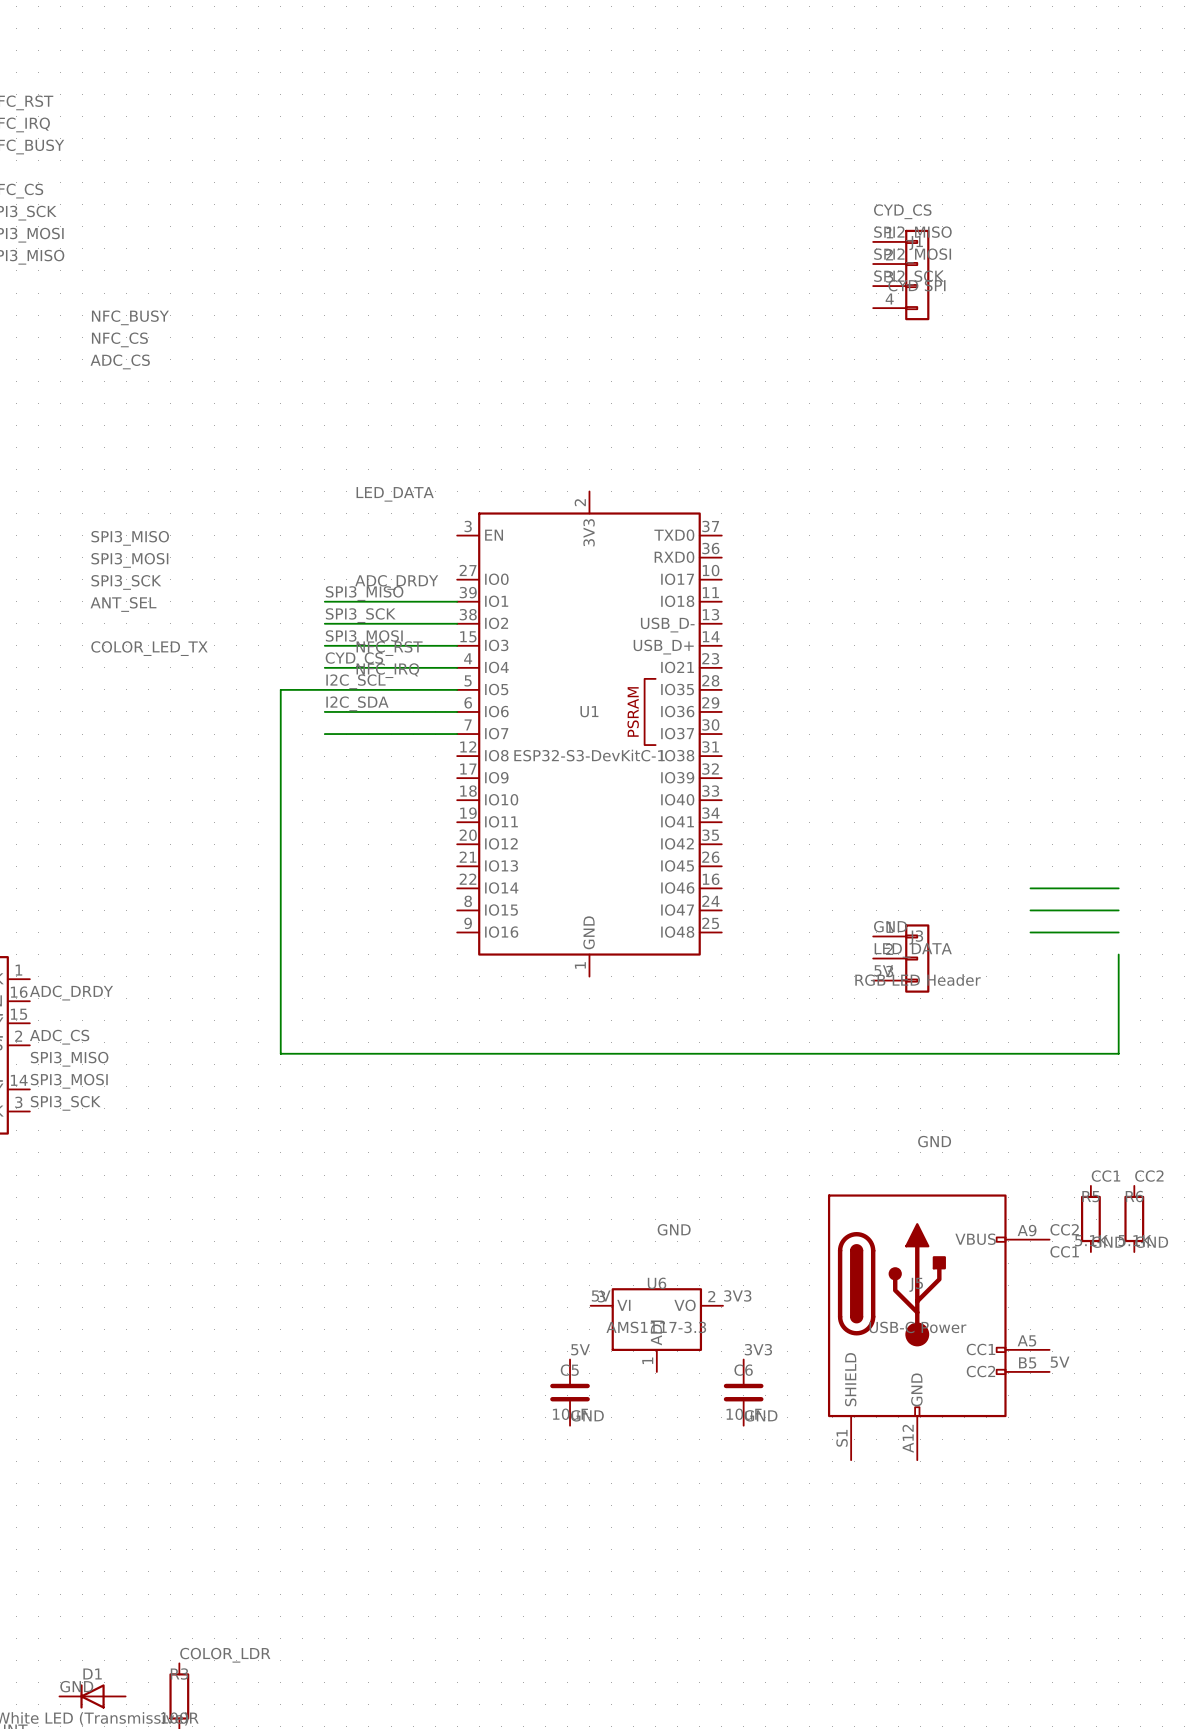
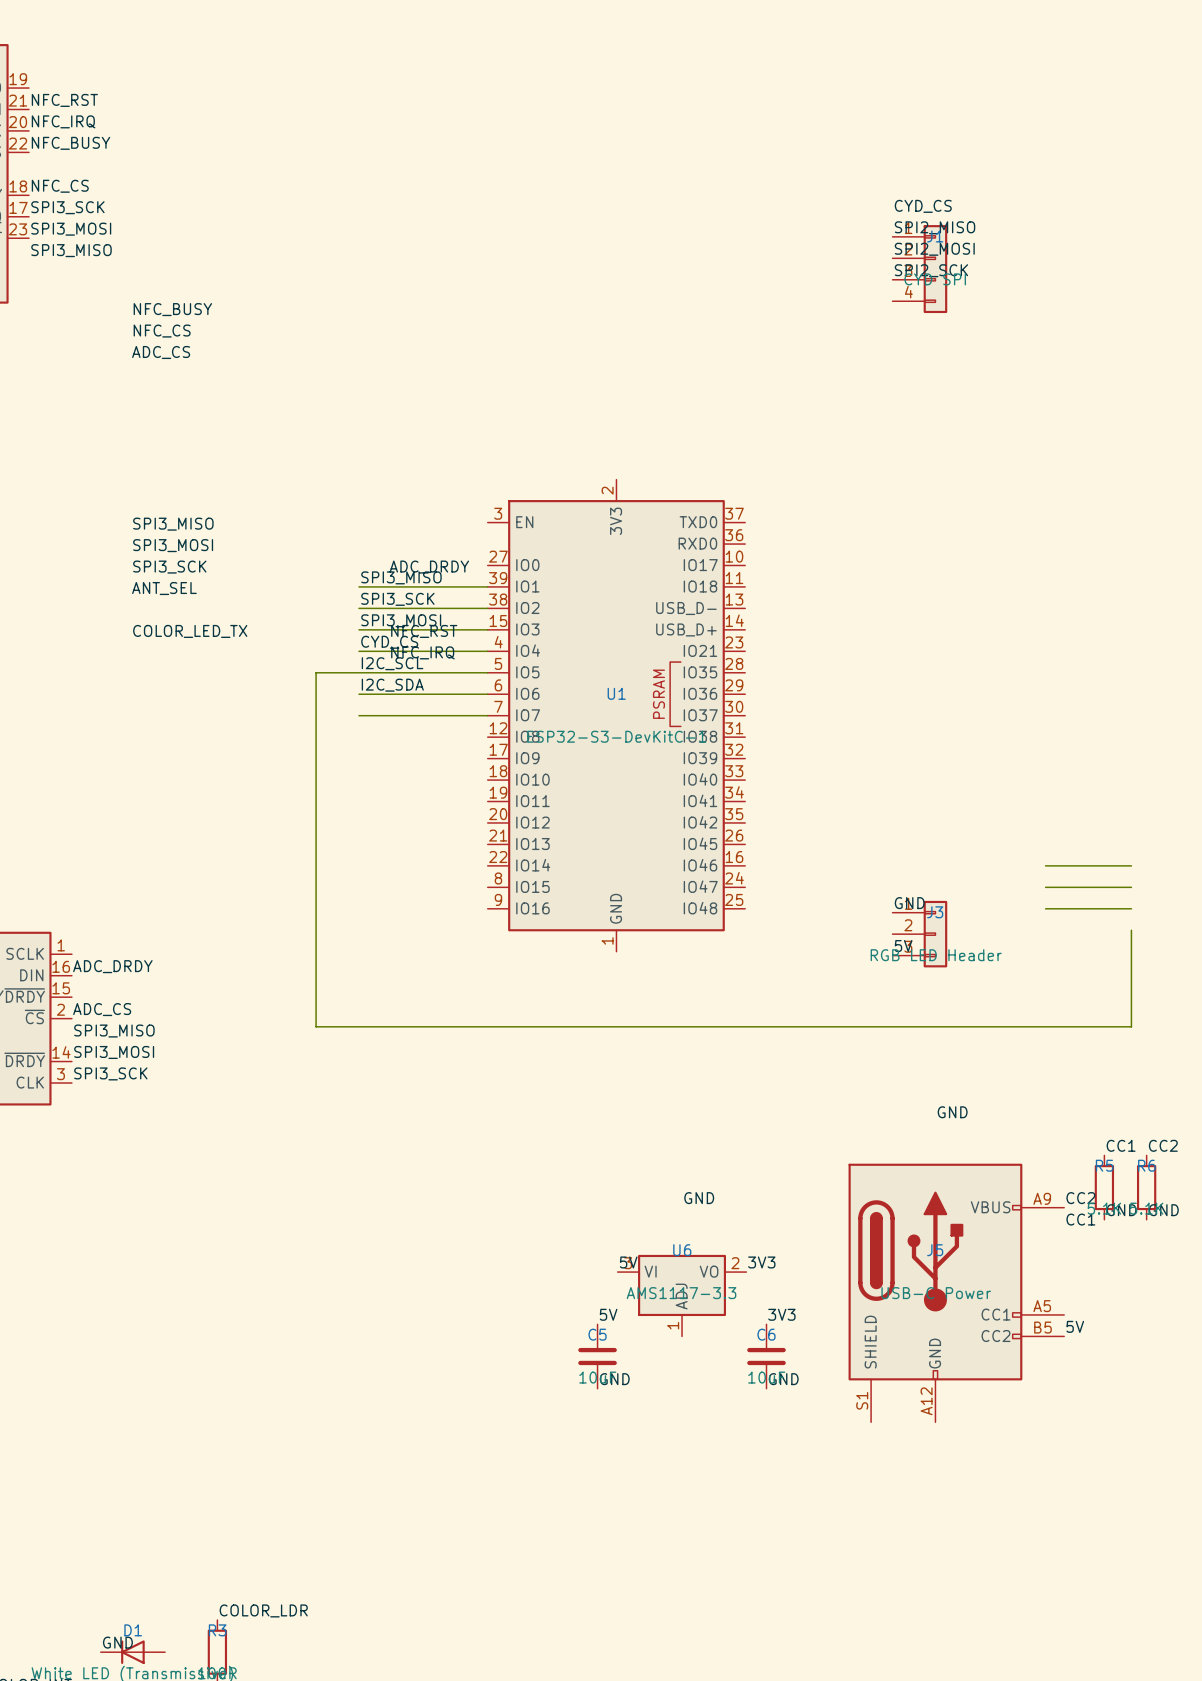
label: LED_DATA (395, 494) -> none
label: LED_DATA (913, 950) -> none

